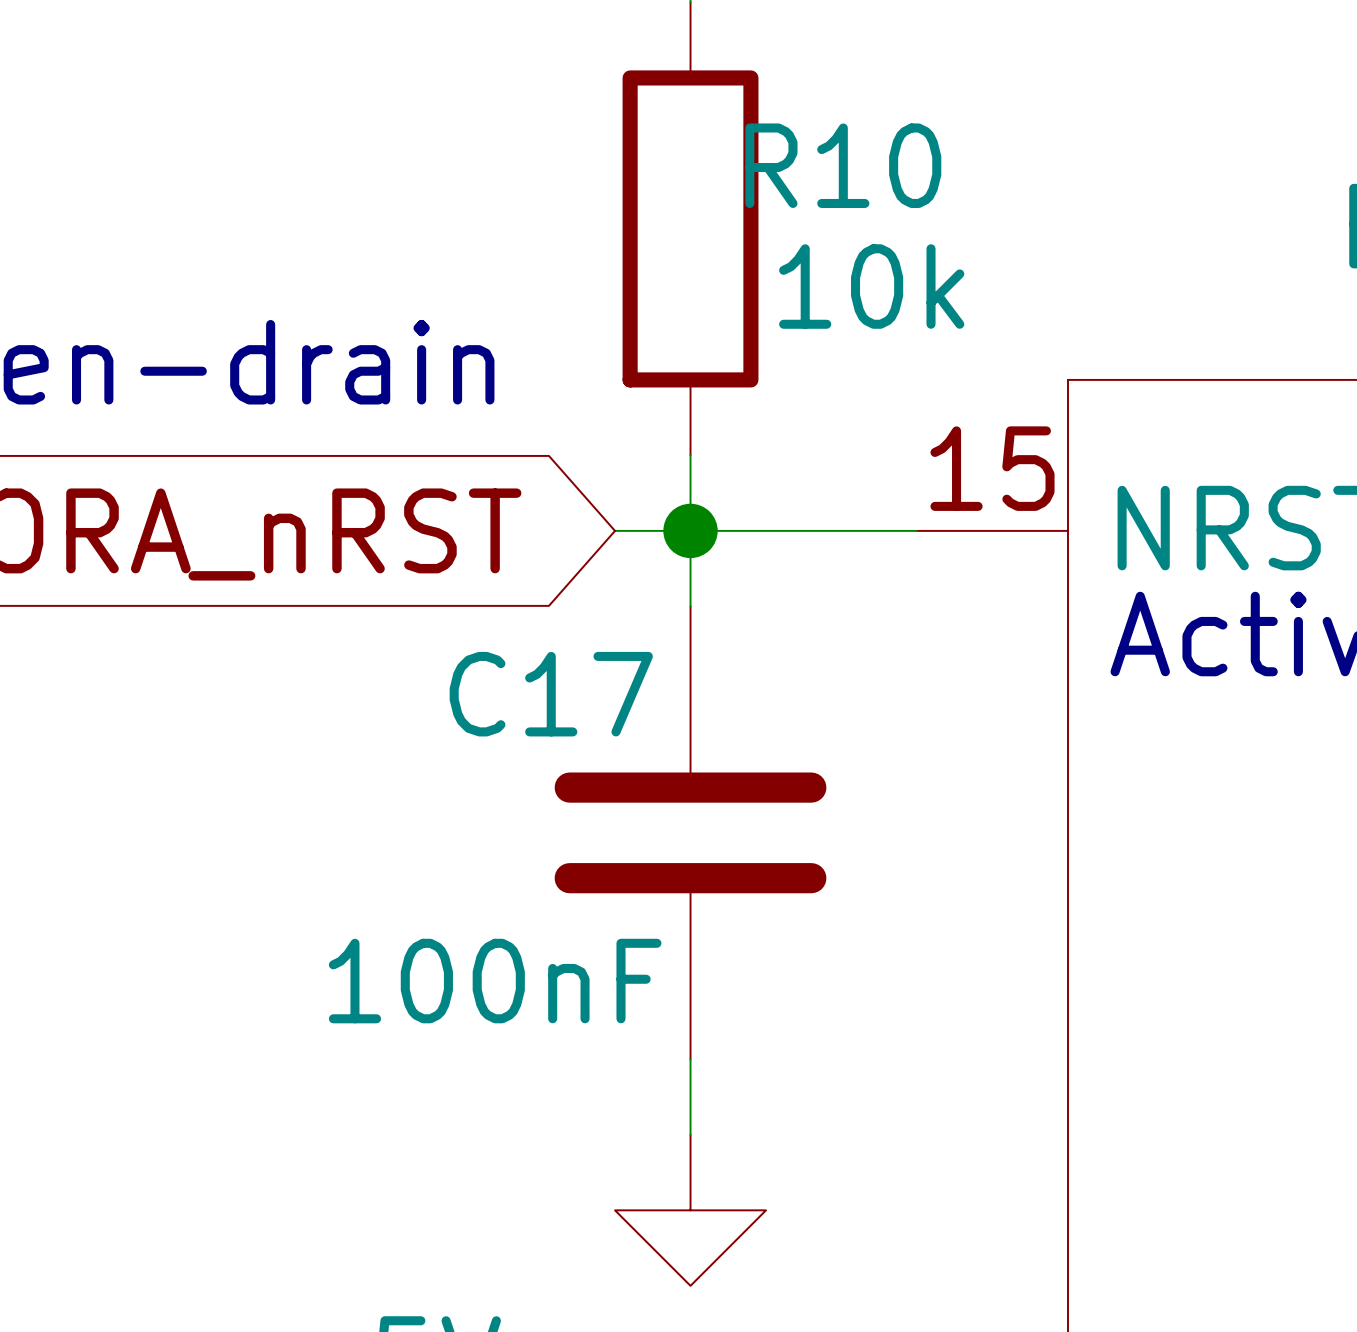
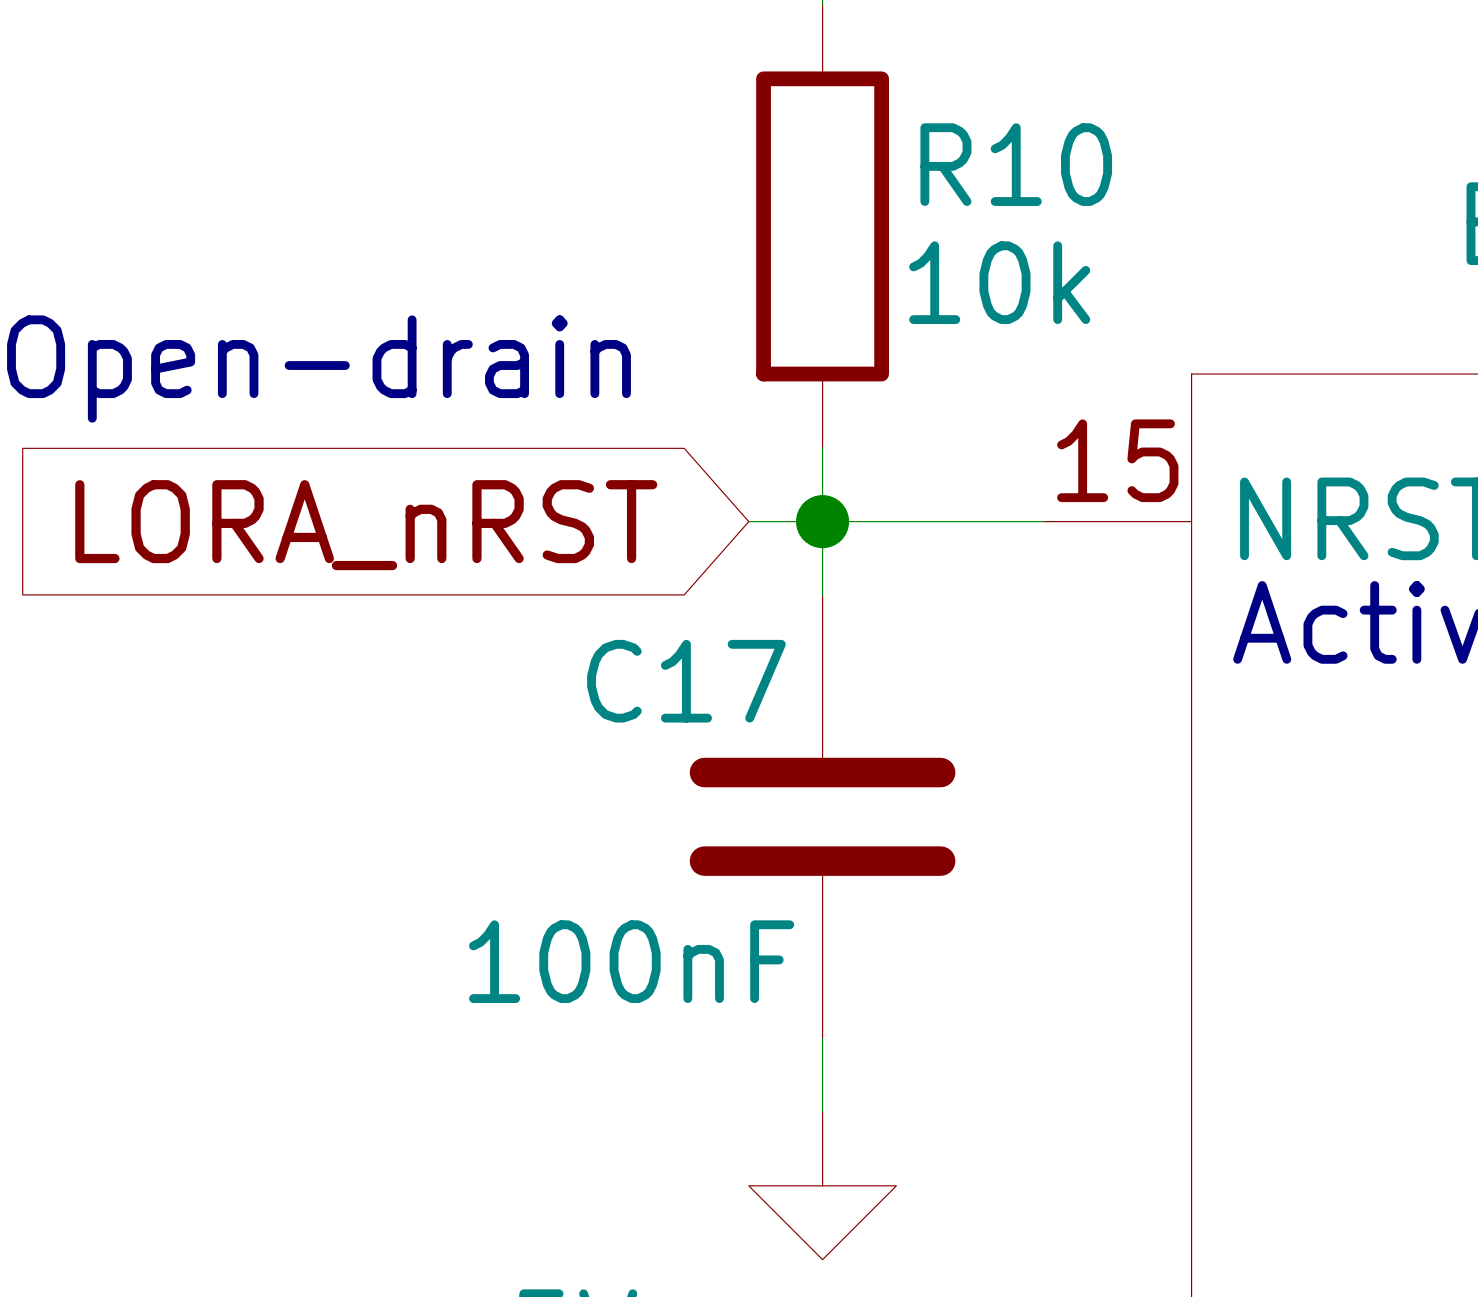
R10 name position: R10 (843, 165) -> R10 (1016, 164)

